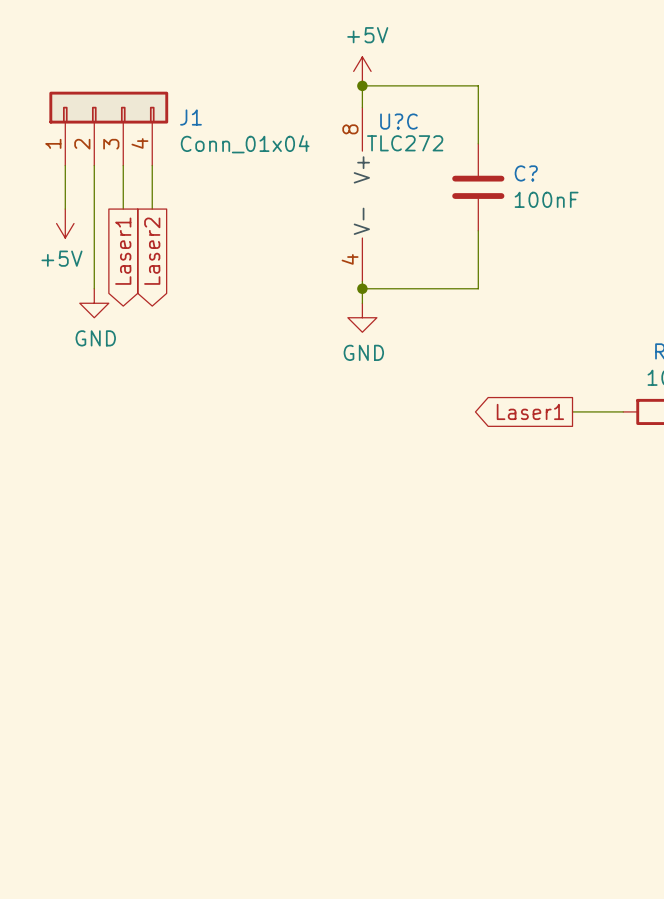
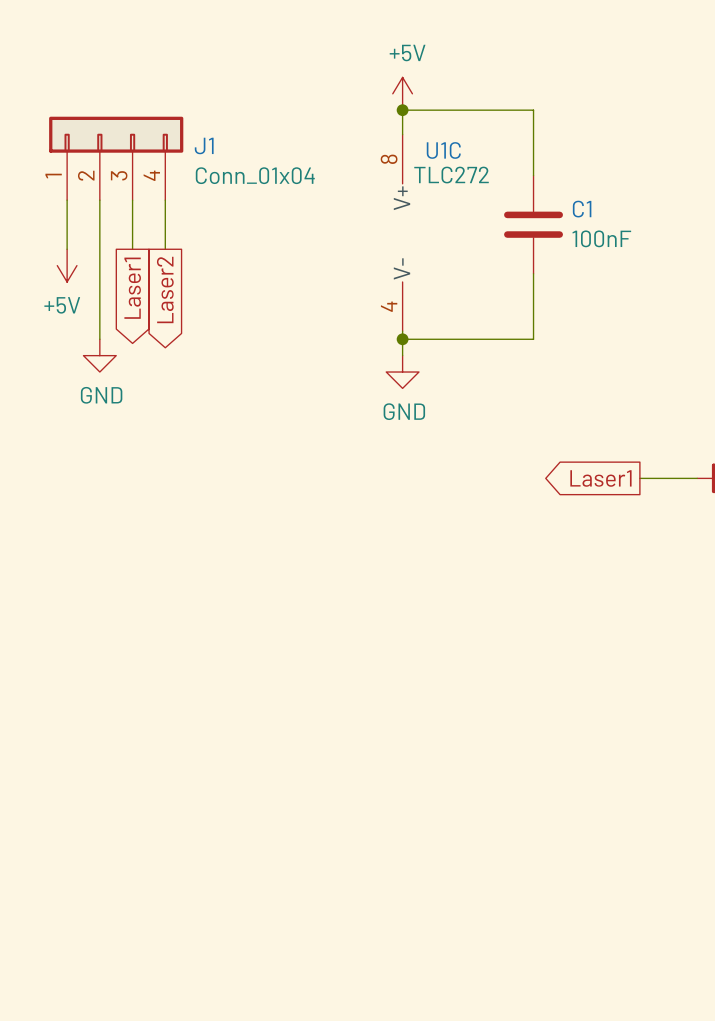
U?C name: U?C (398, 121) -> U1C (443, 150)
C? name: C? (526, 173) -> C1 (582, 209)

